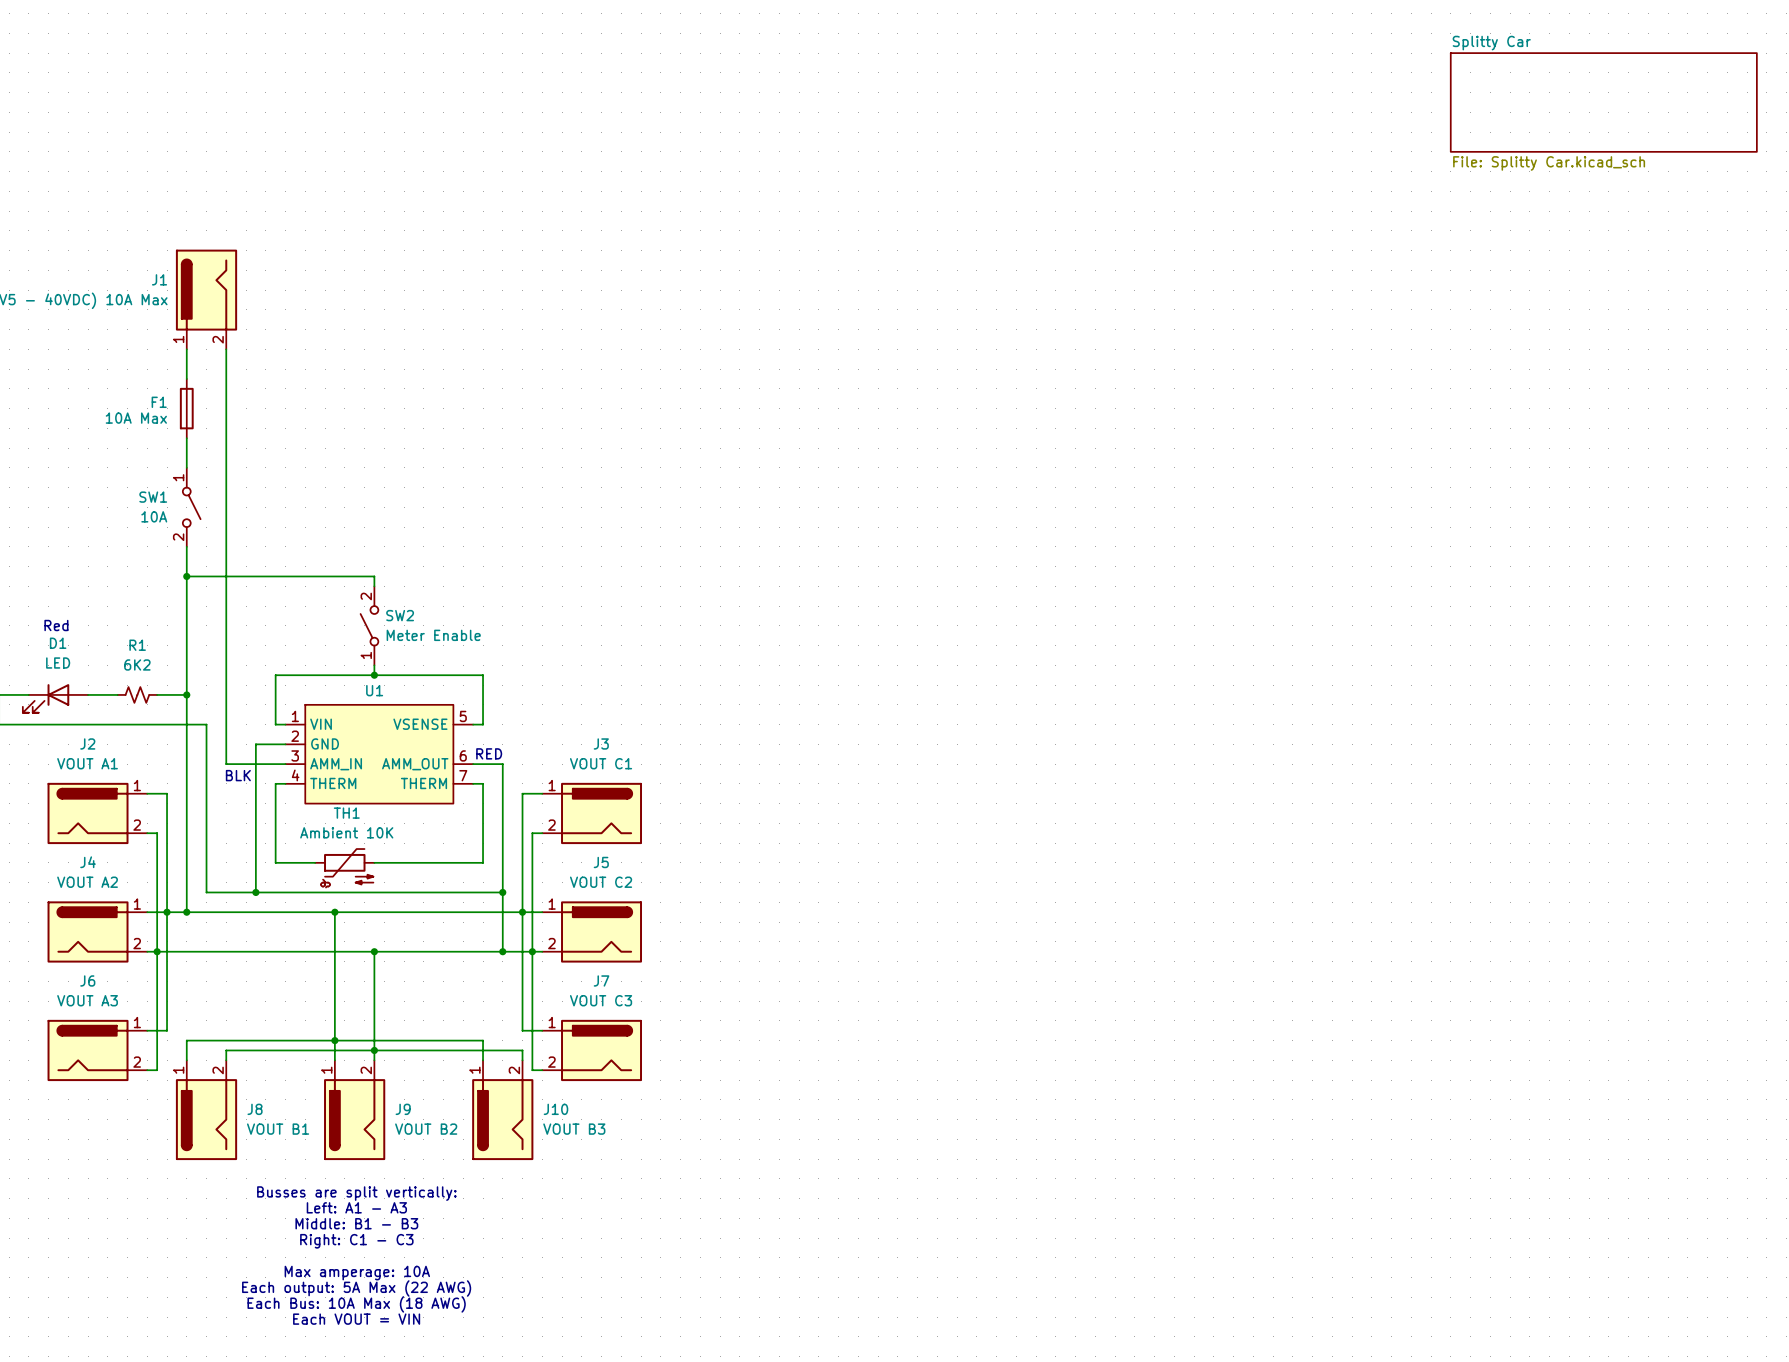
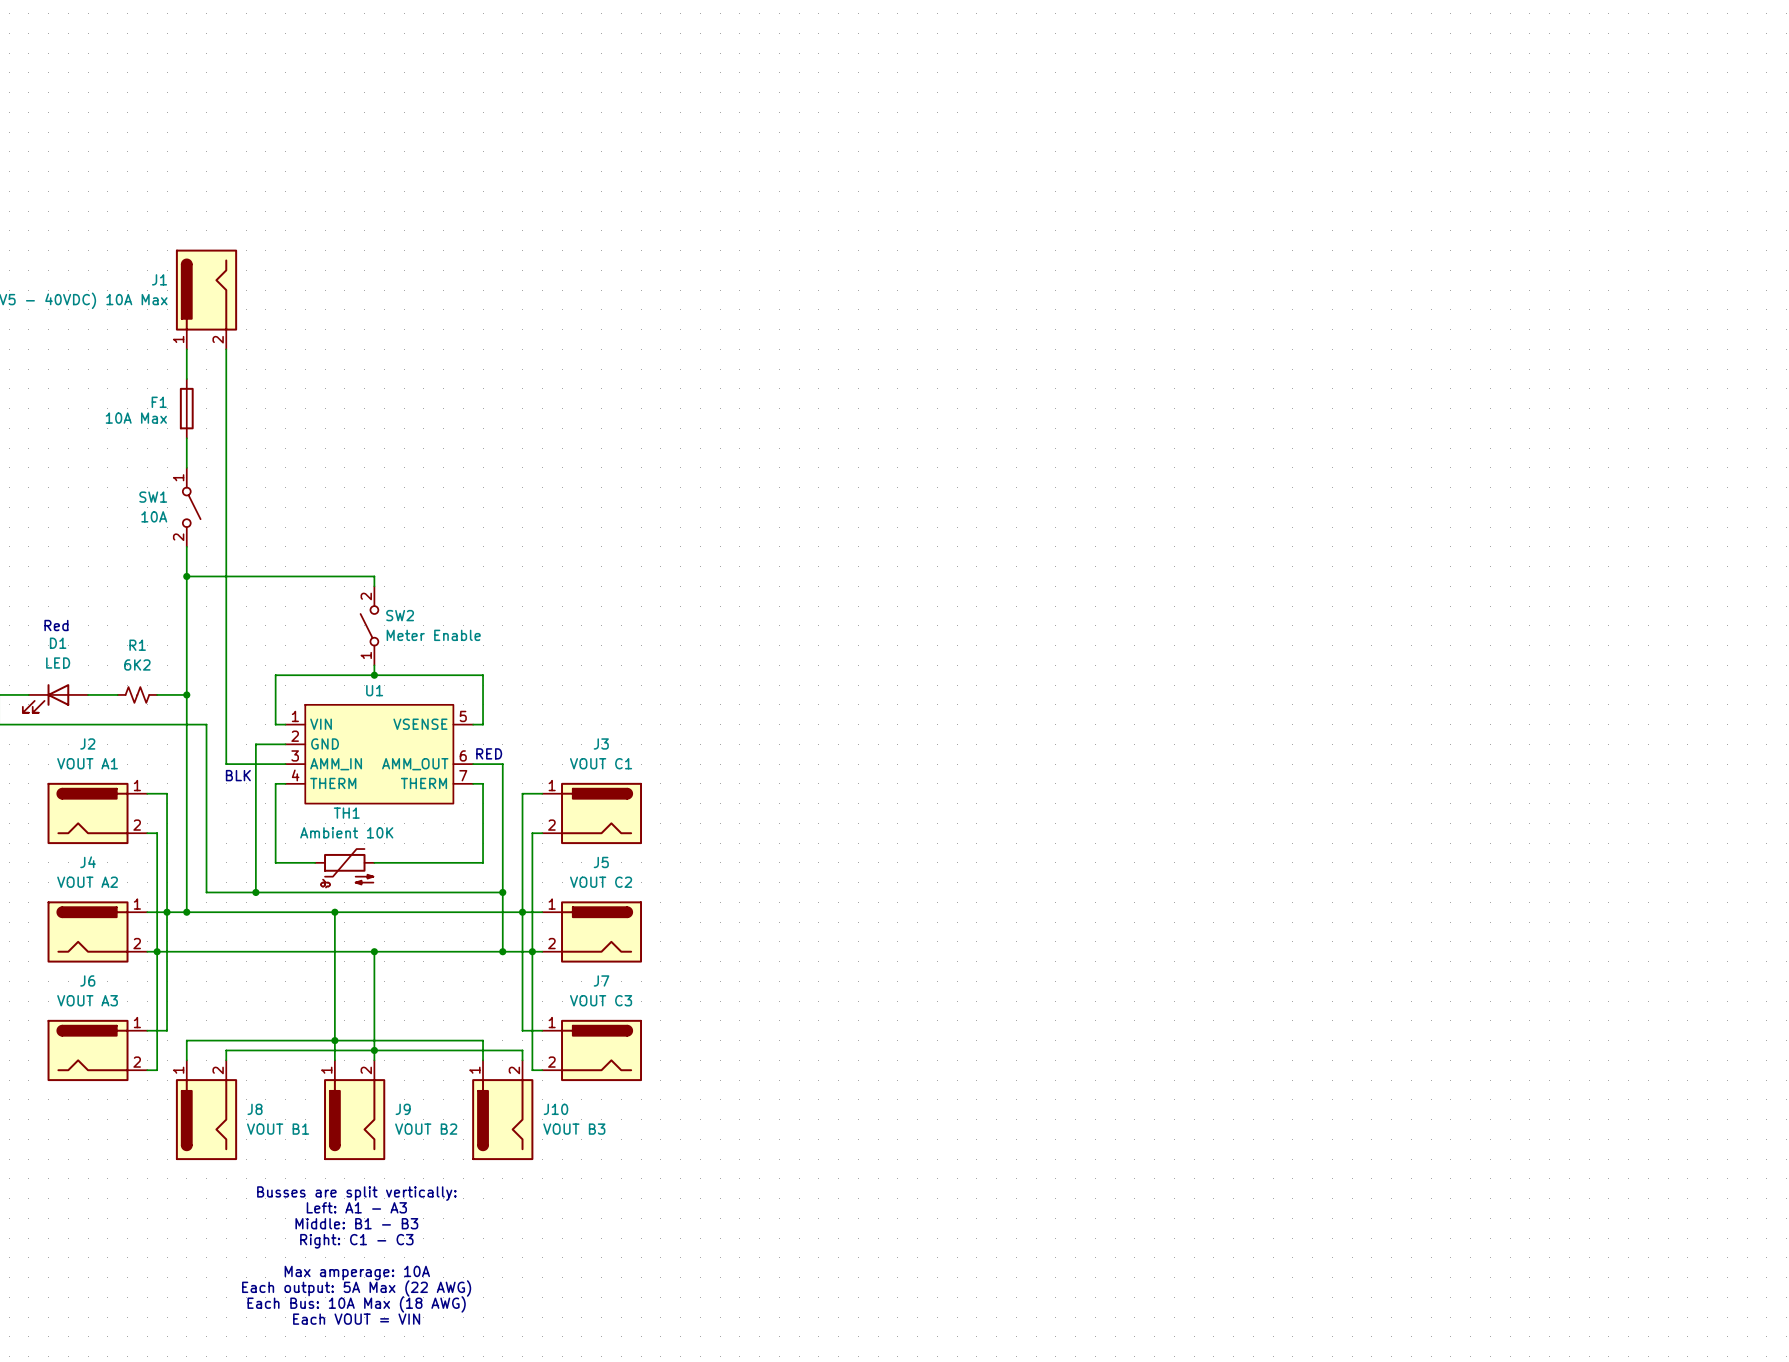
sheet Splitty Car: File: Splitty Car.kicad_sch (1603, 102) -> none

